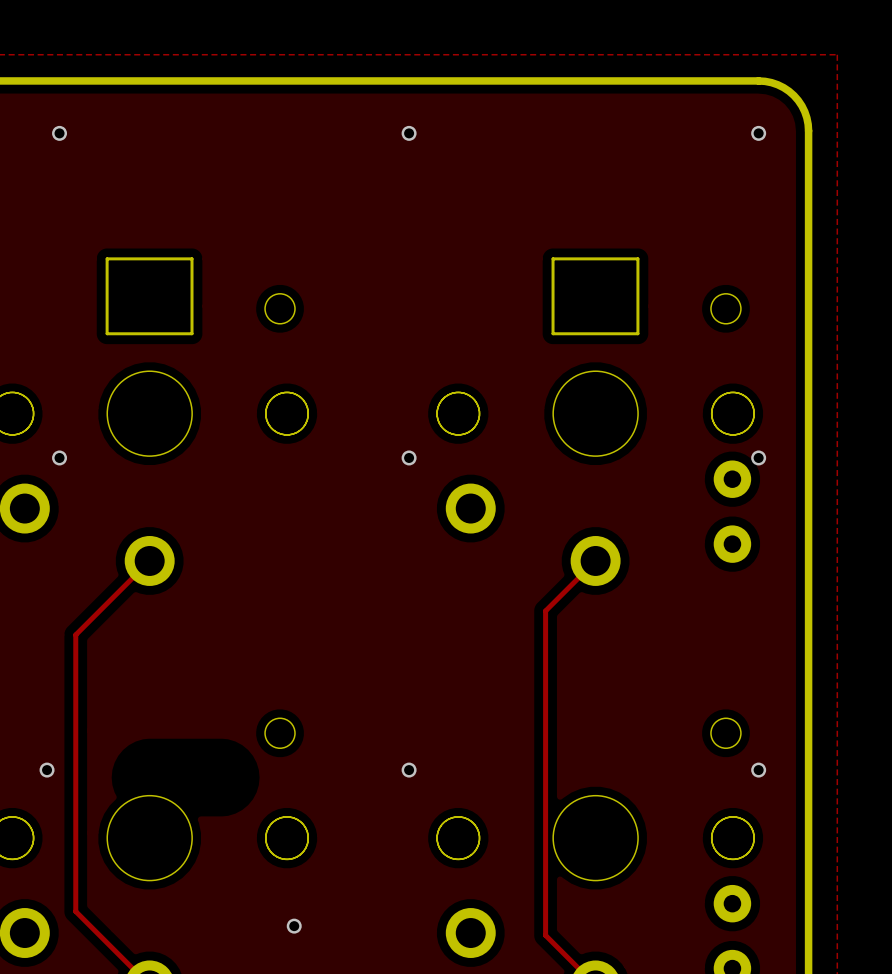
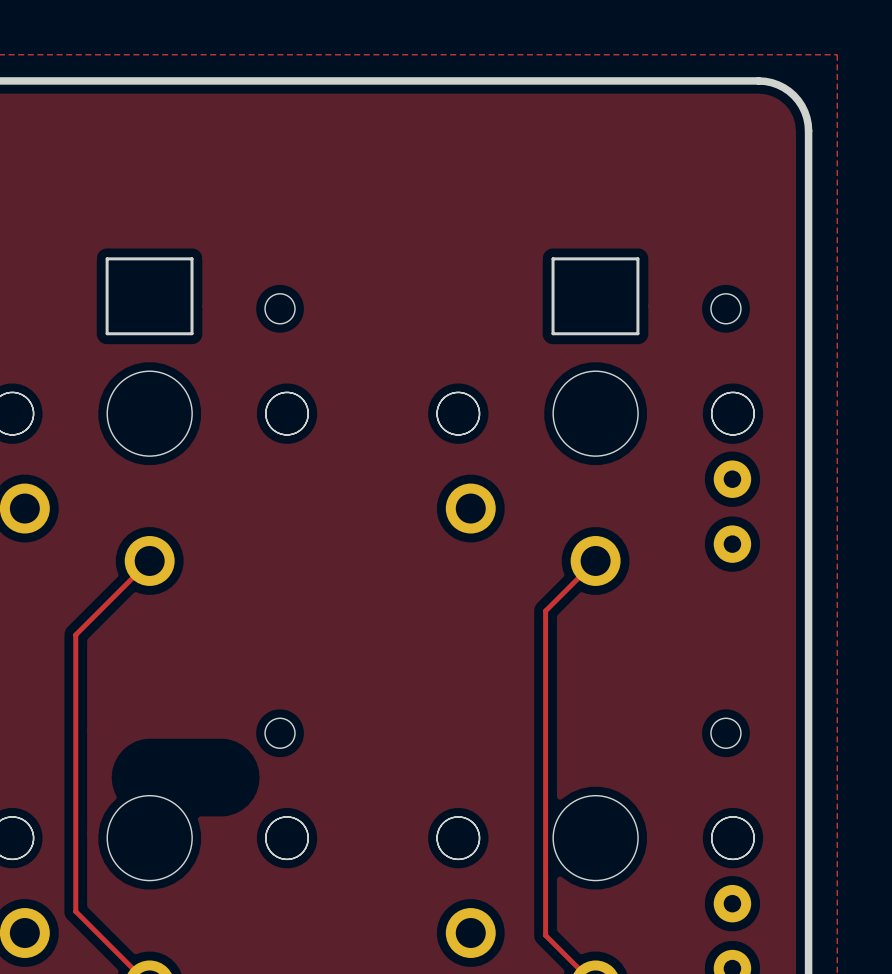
via: (59, 133) -> none
via: (409, 133) -> none
via: (758, 133) -> none
via: (59, 457) -> none
via: (409, 457) -> none
via: (758, 457) -> none
via: (47, 770) -> none
via: (409, 770) -> none
via: (758, 770) -> none
via: (294, 926) -> none

